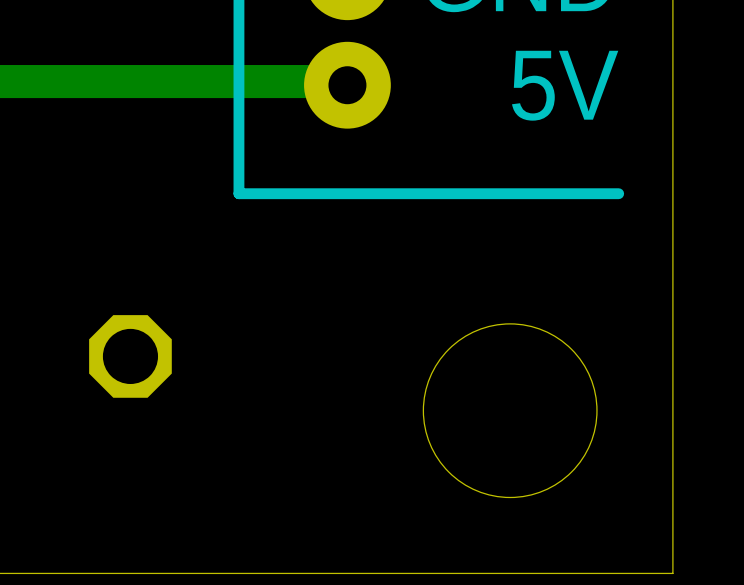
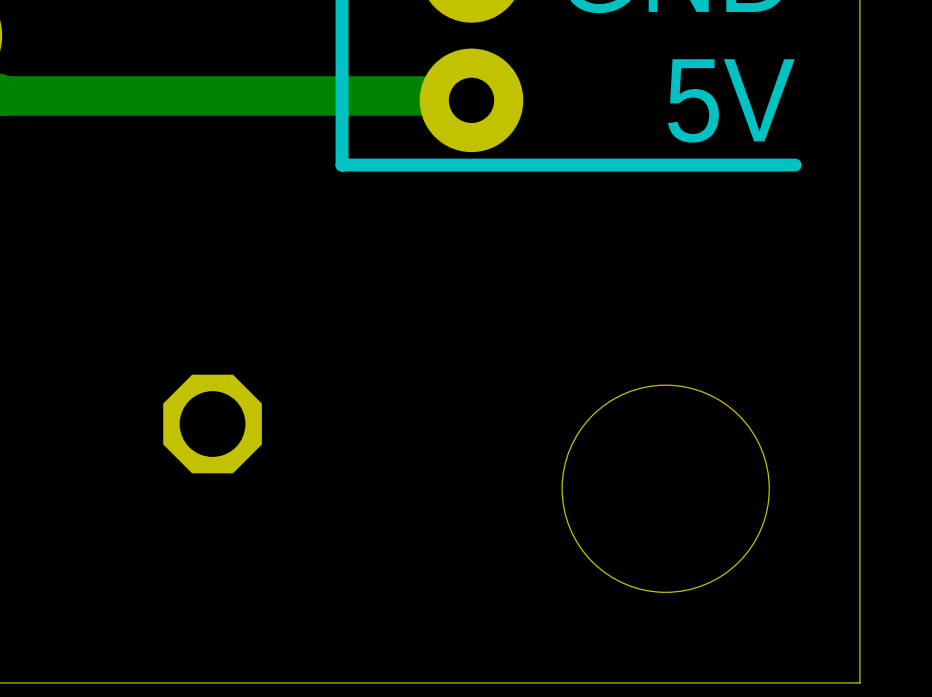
line: (238, 139) (238, 193) (618, 193) -> (342, 165) (795, 165)

